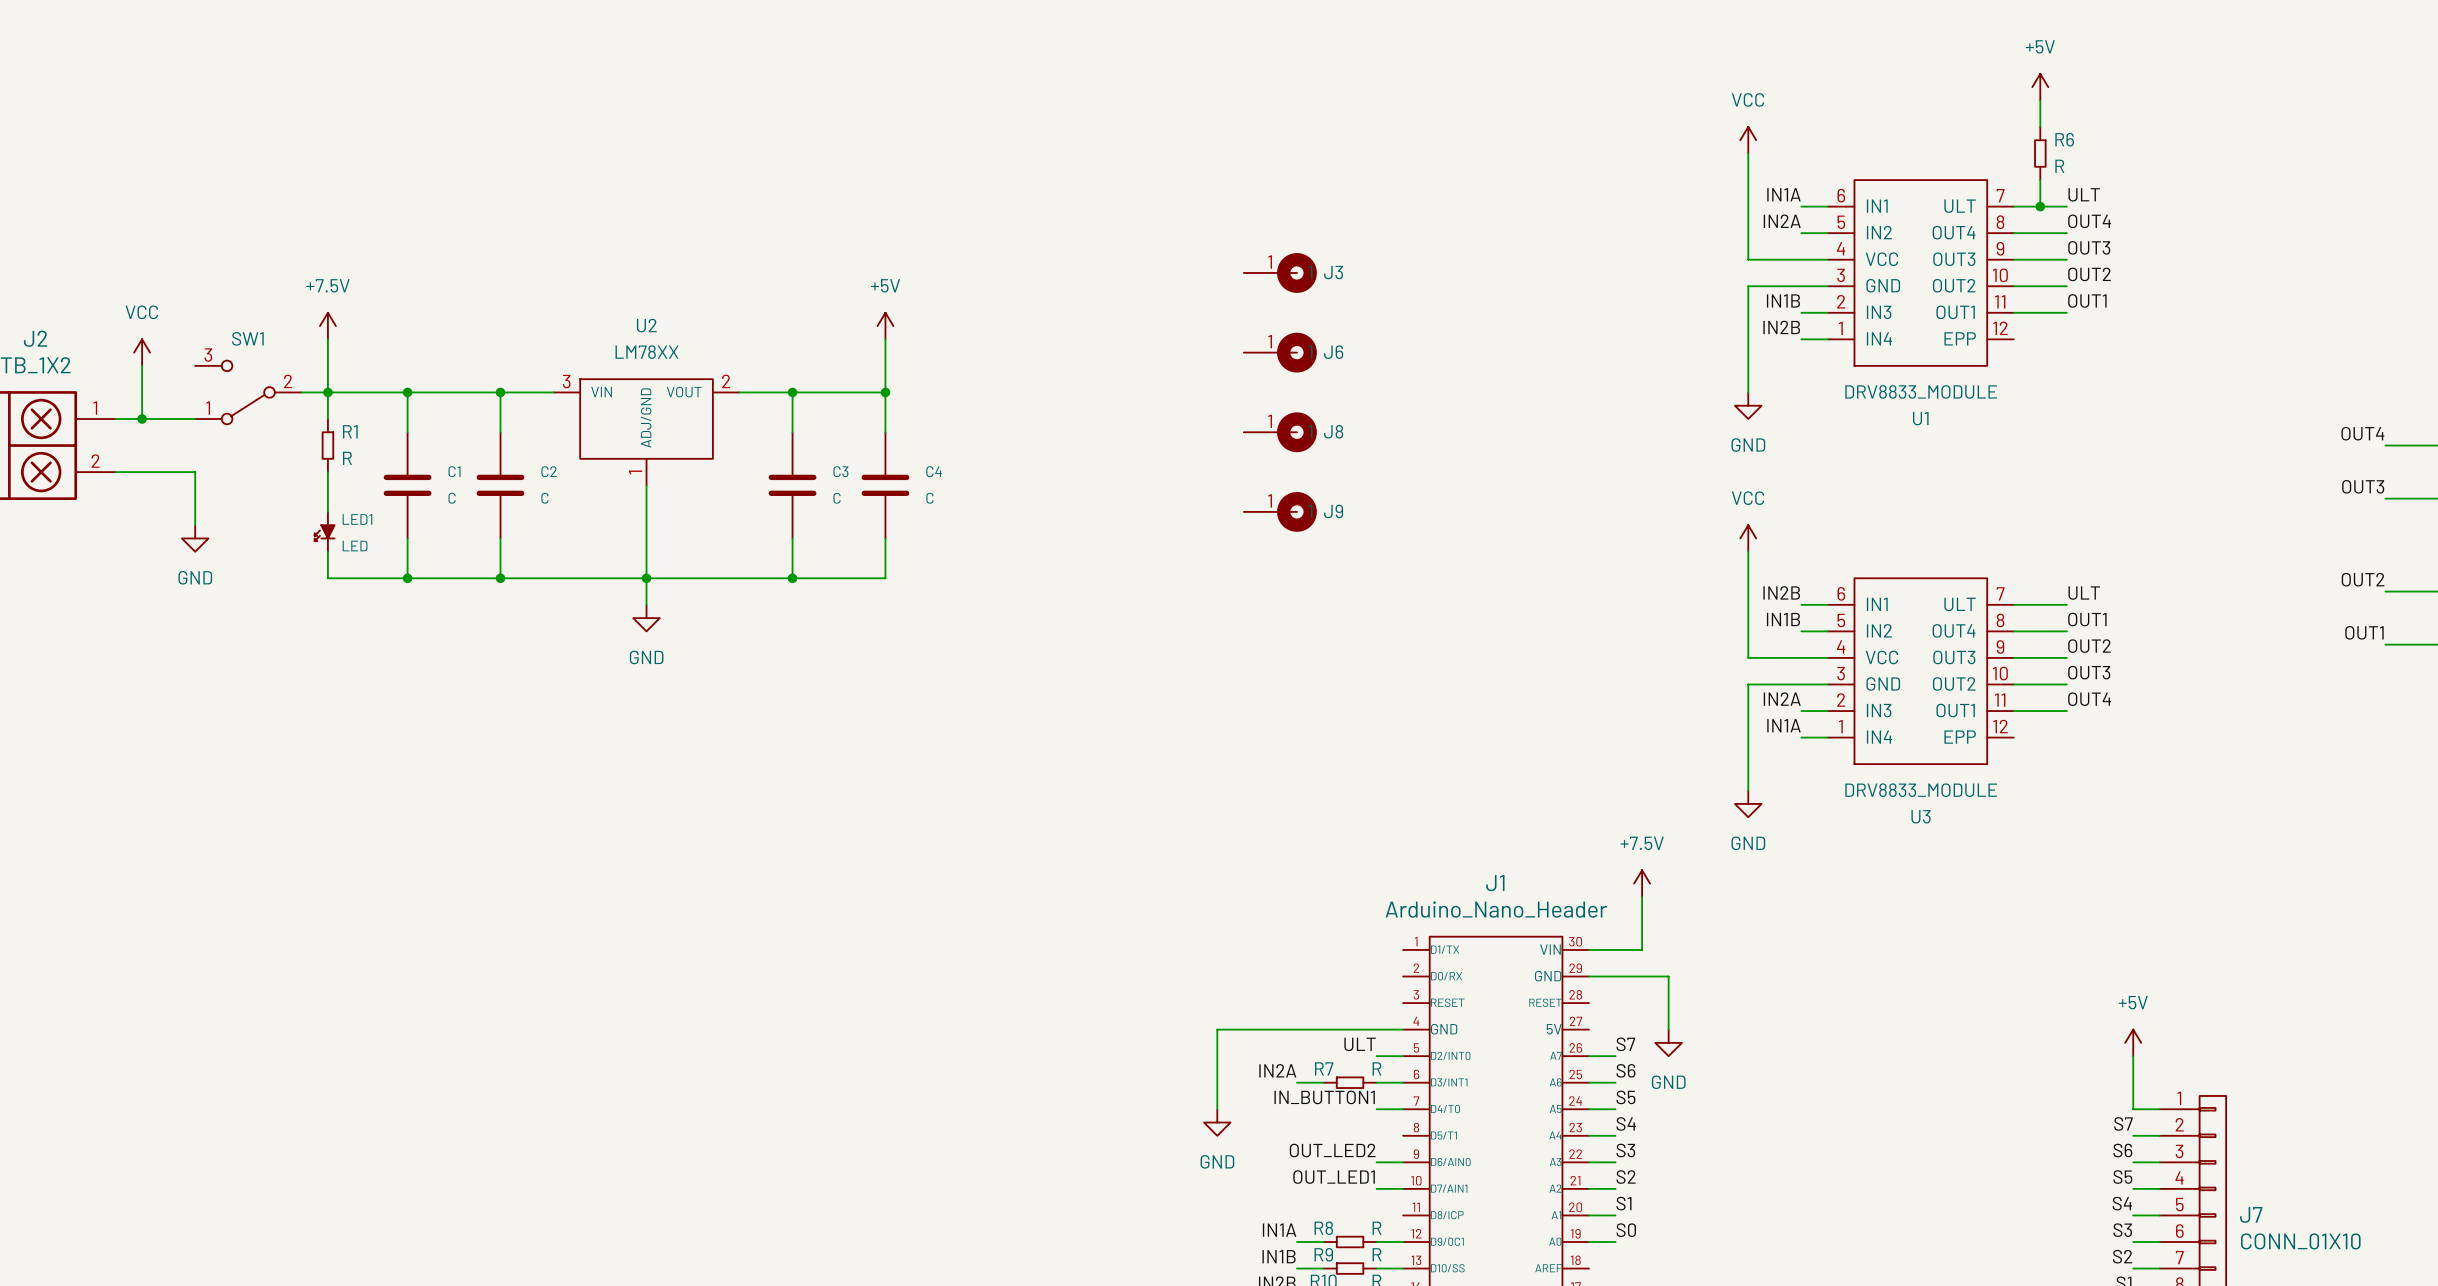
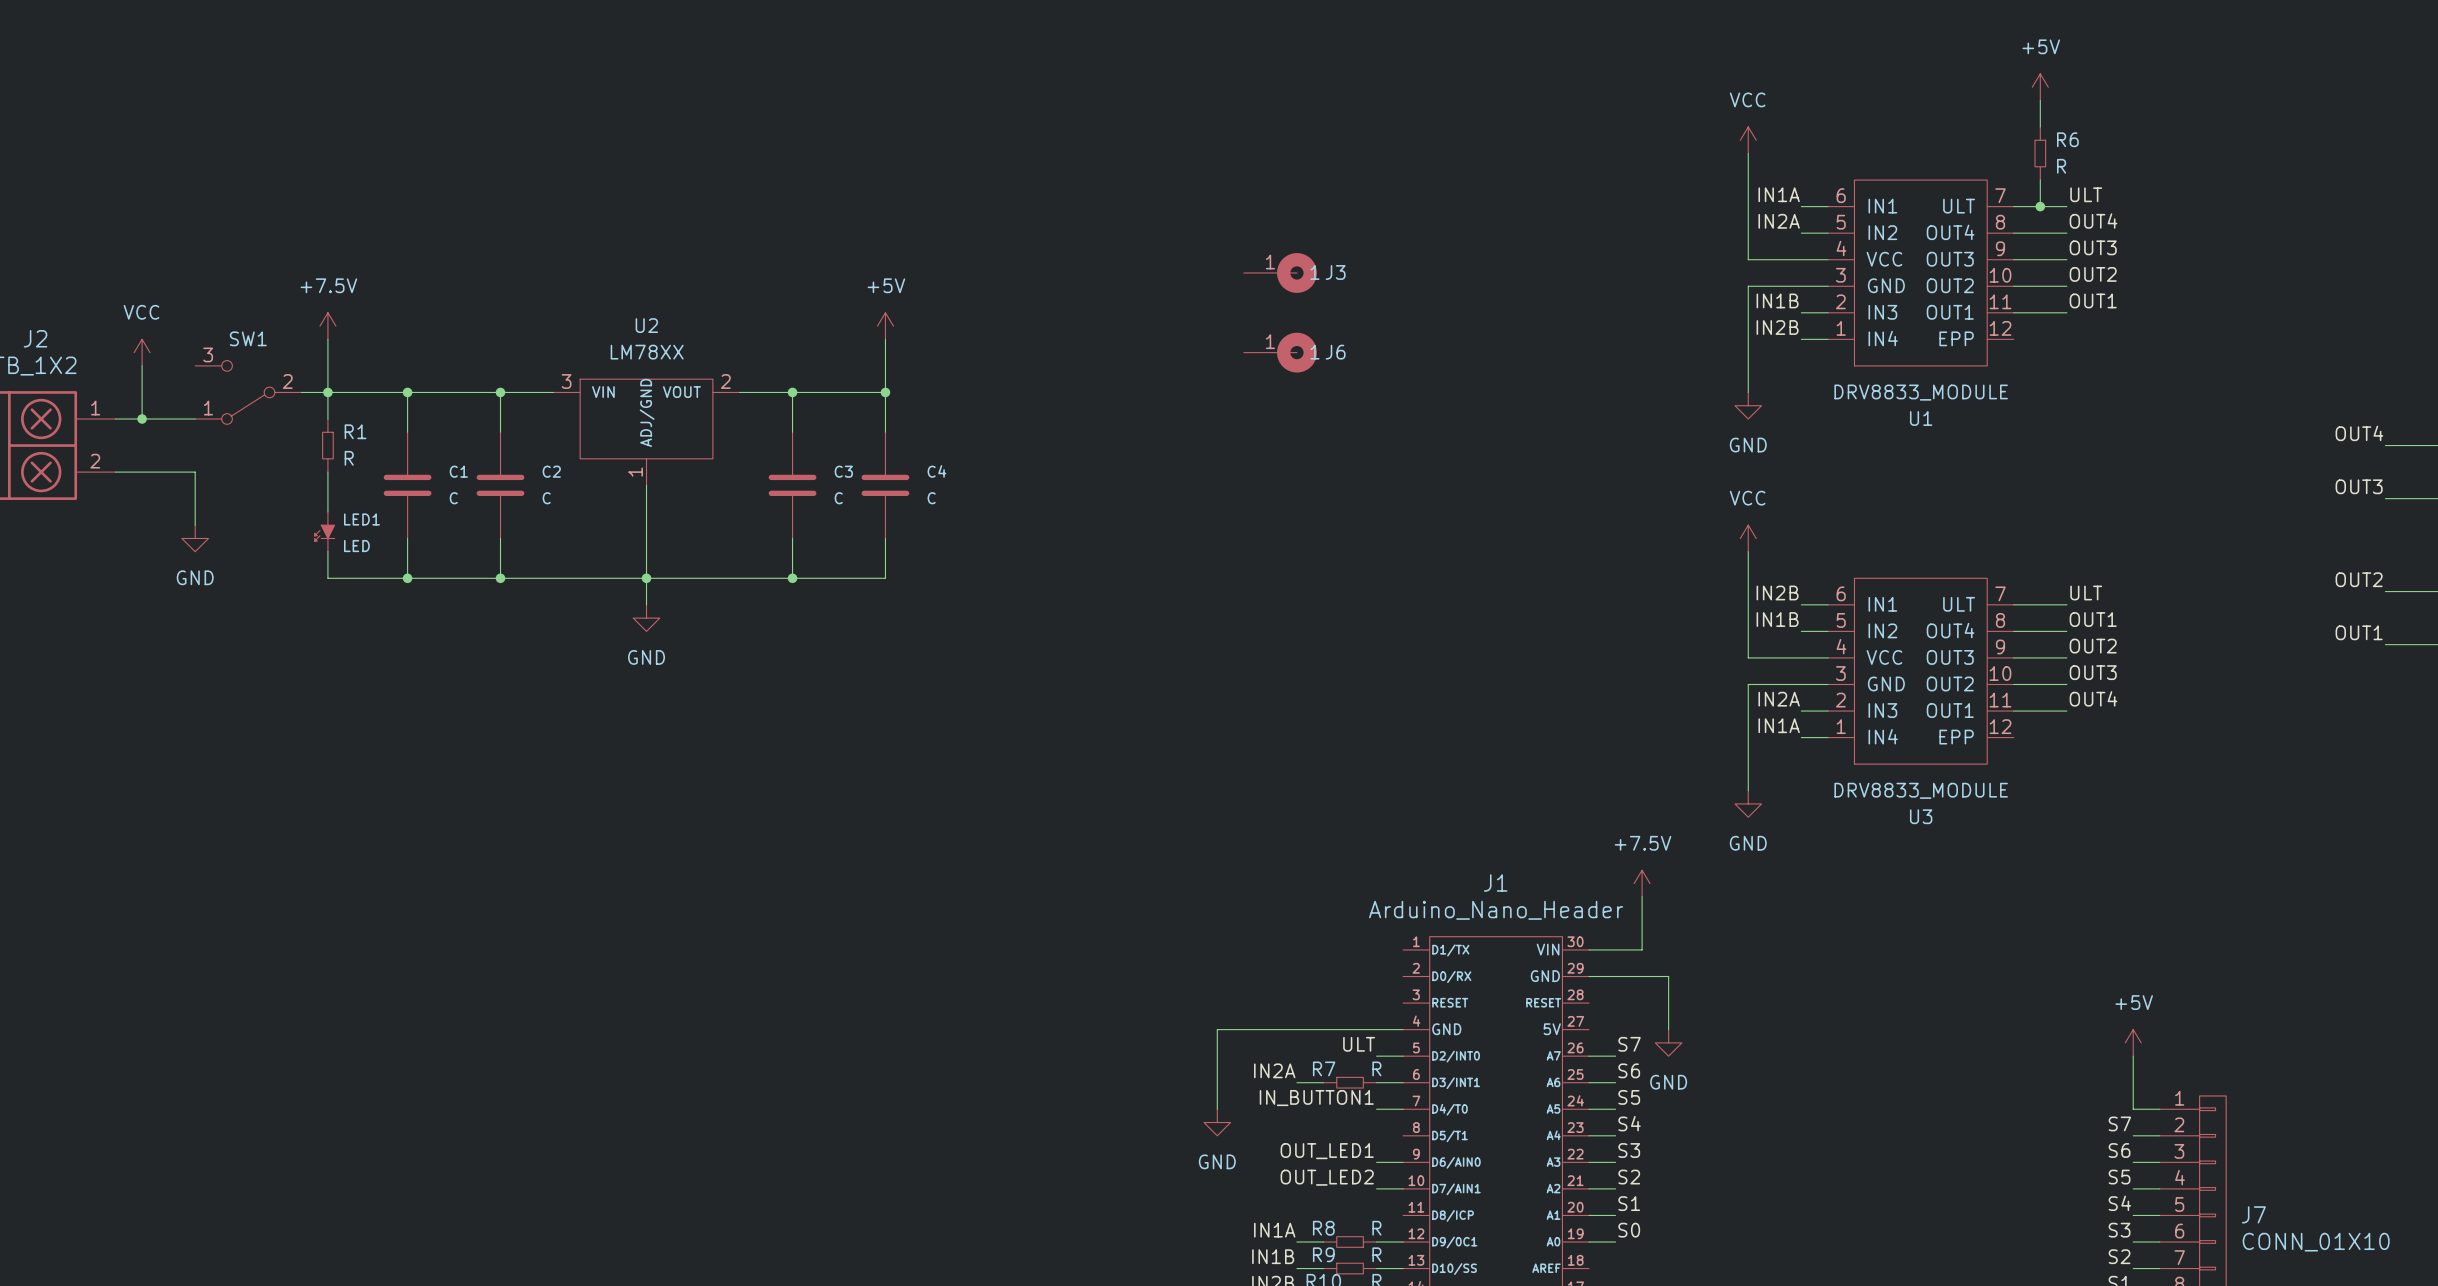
J8: (1280, 432) -> none
J9: (1280, 511) -> none
label: OUT_LED2 (1332, 1150) -> OUT_LED1 (1327, 1151)
label: OUT_LED1 (1334, 1177) -> OUT_LED2 (1327, 1177)

